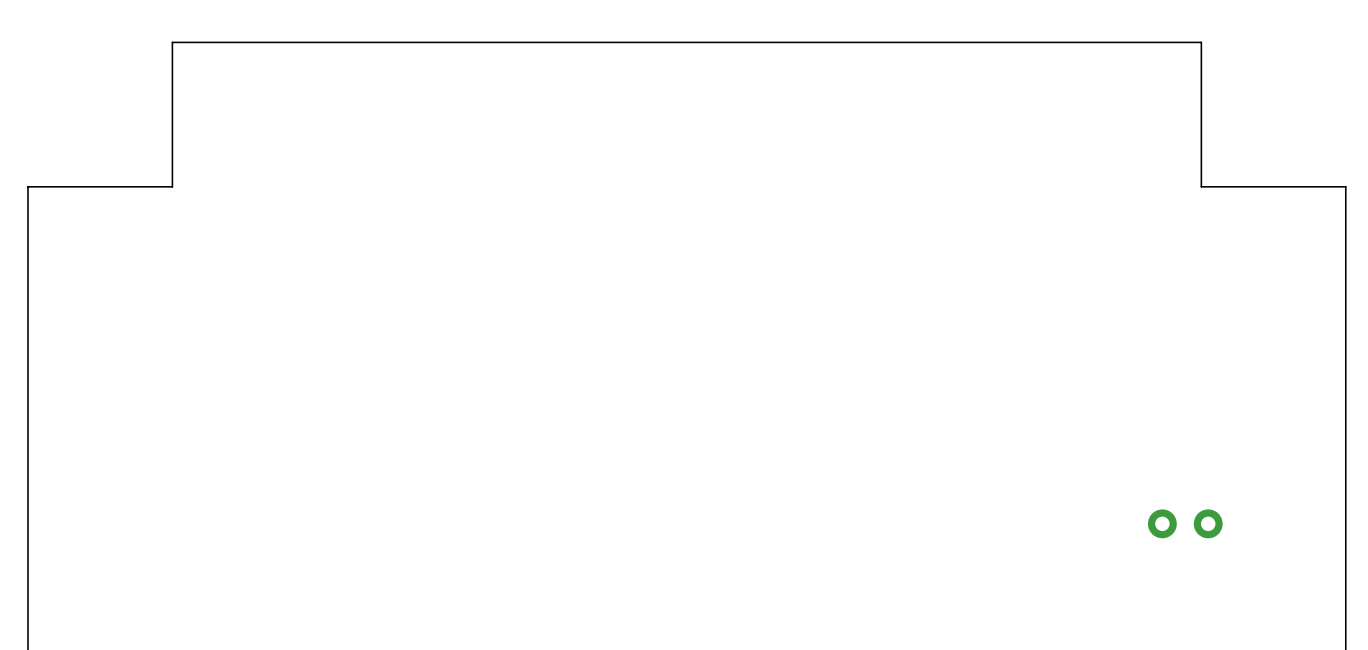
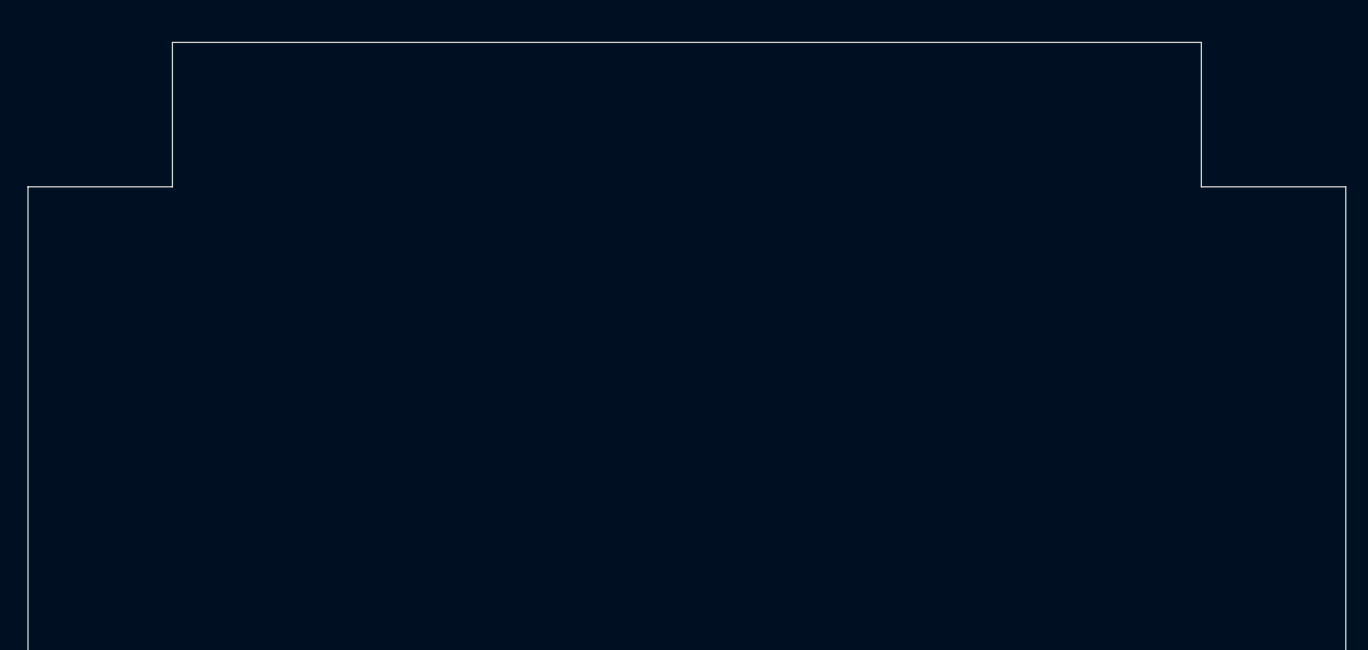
part: (1185, 523) -> none

